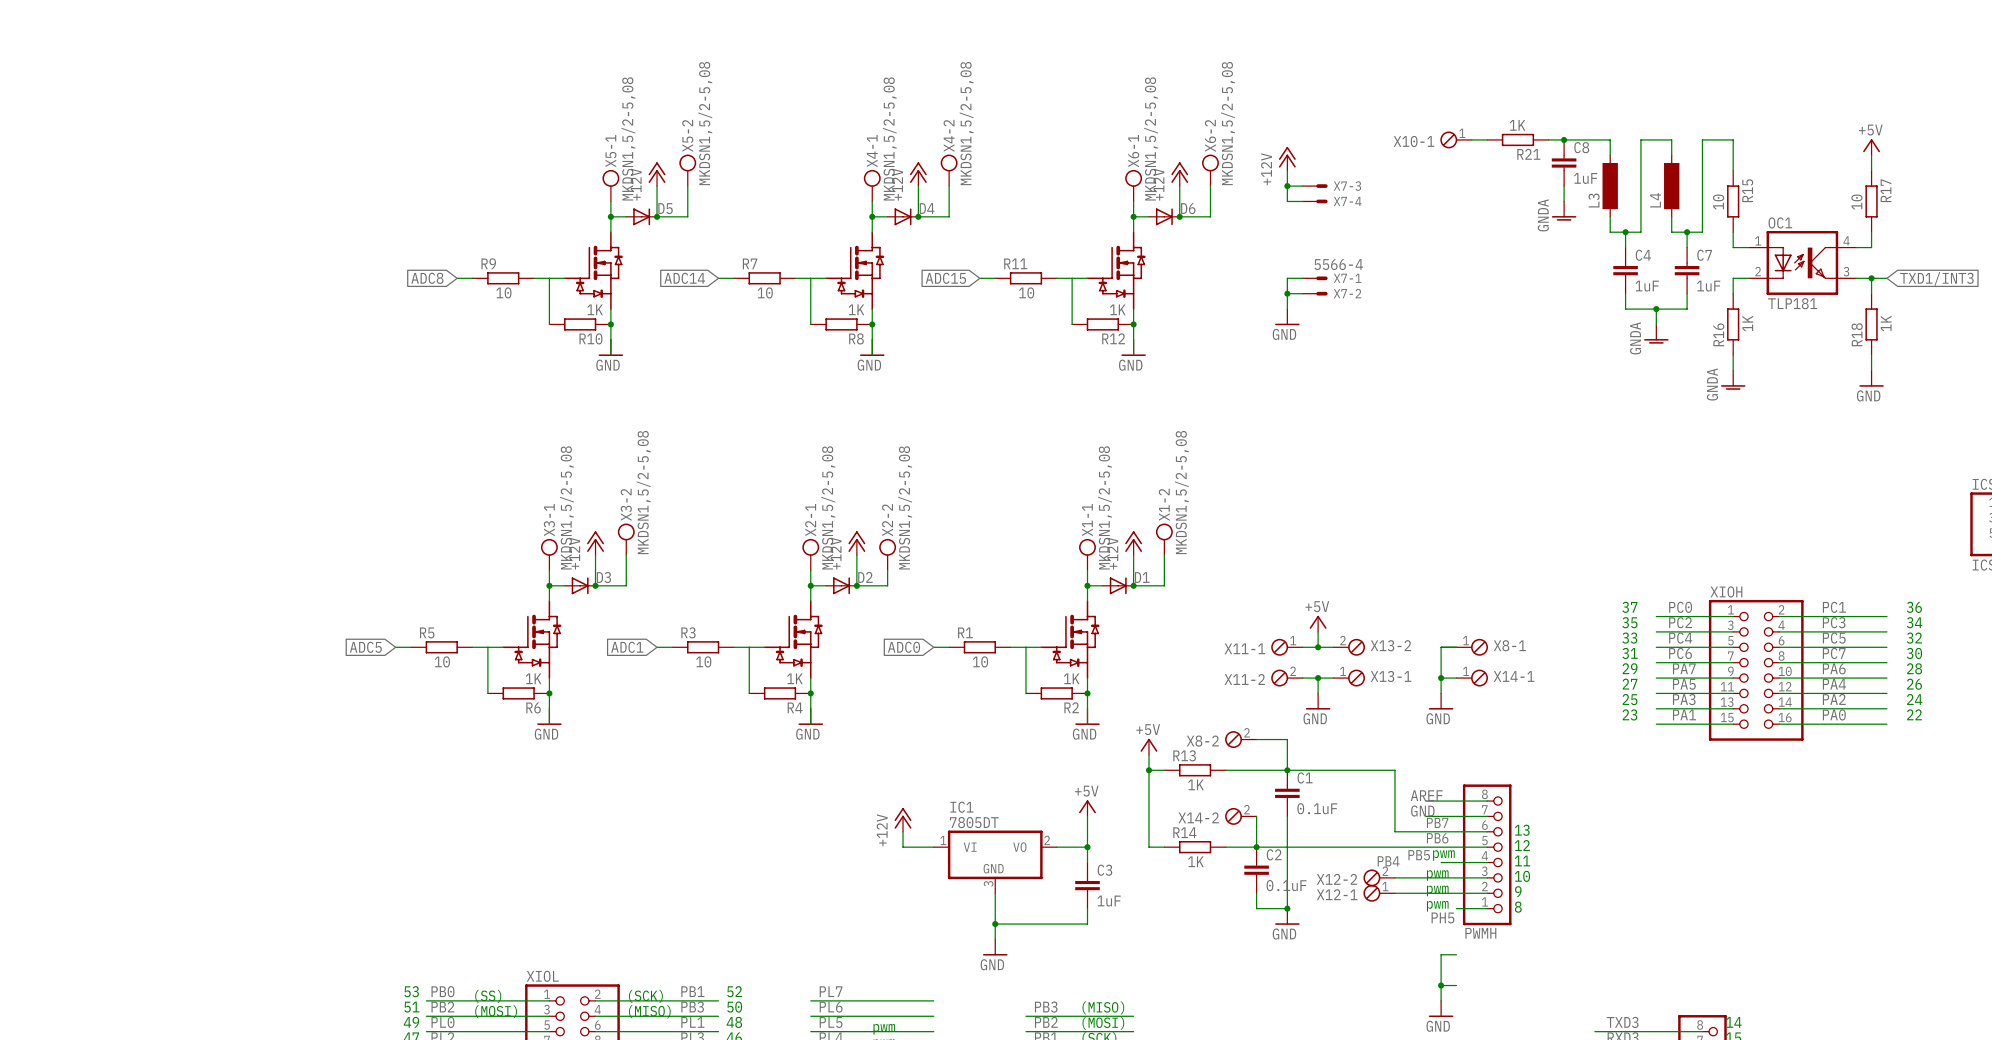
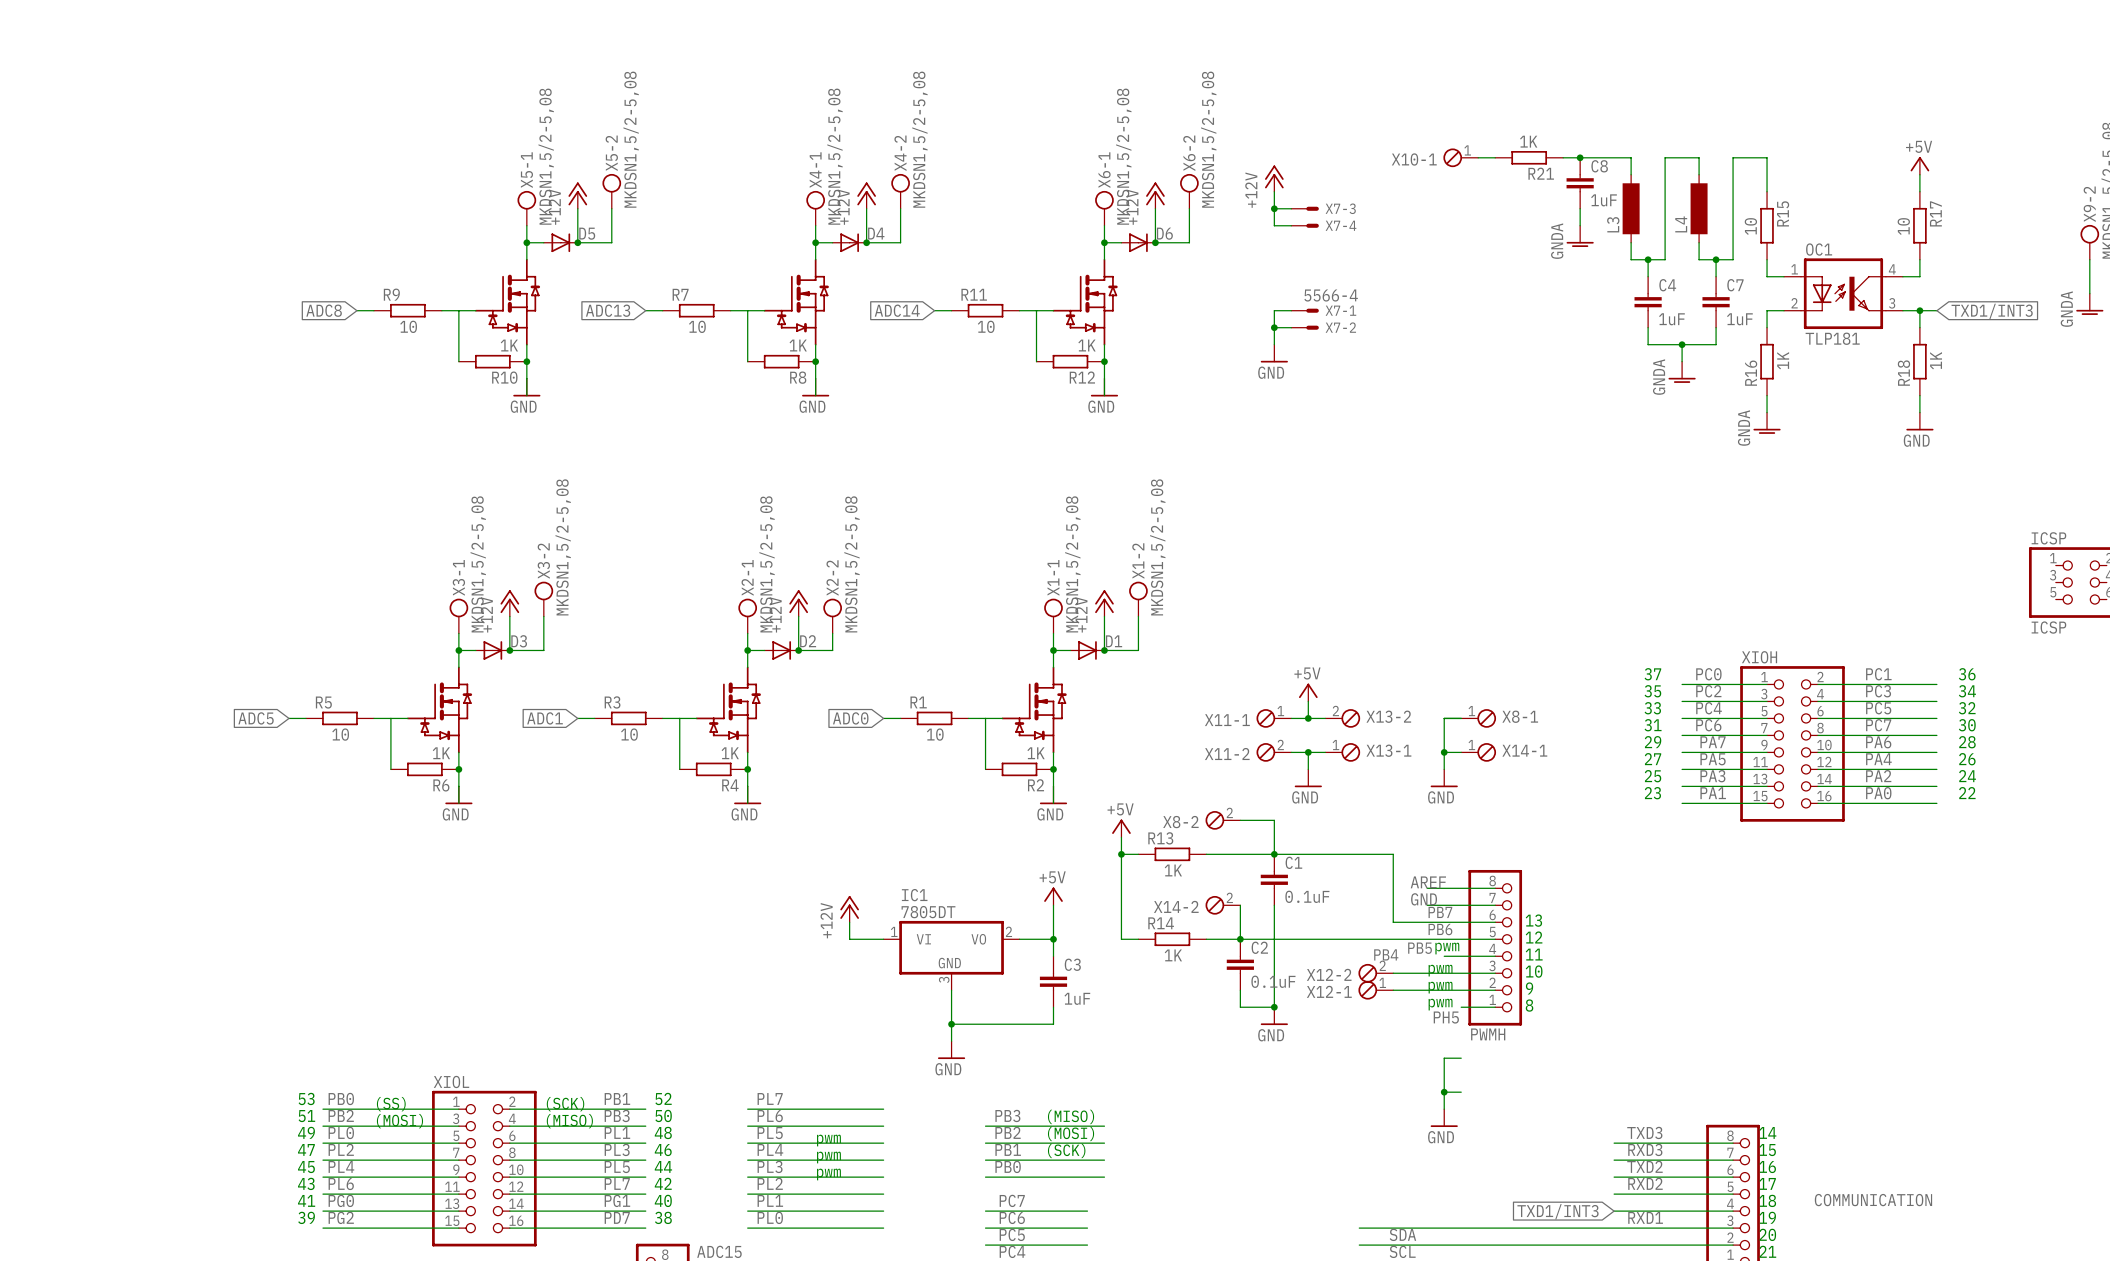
global label: ADC14 (684, 278) -> ADC13 (608, 310)
global label: ADC15 (945, 278) -> ADC14 (897, 310)

